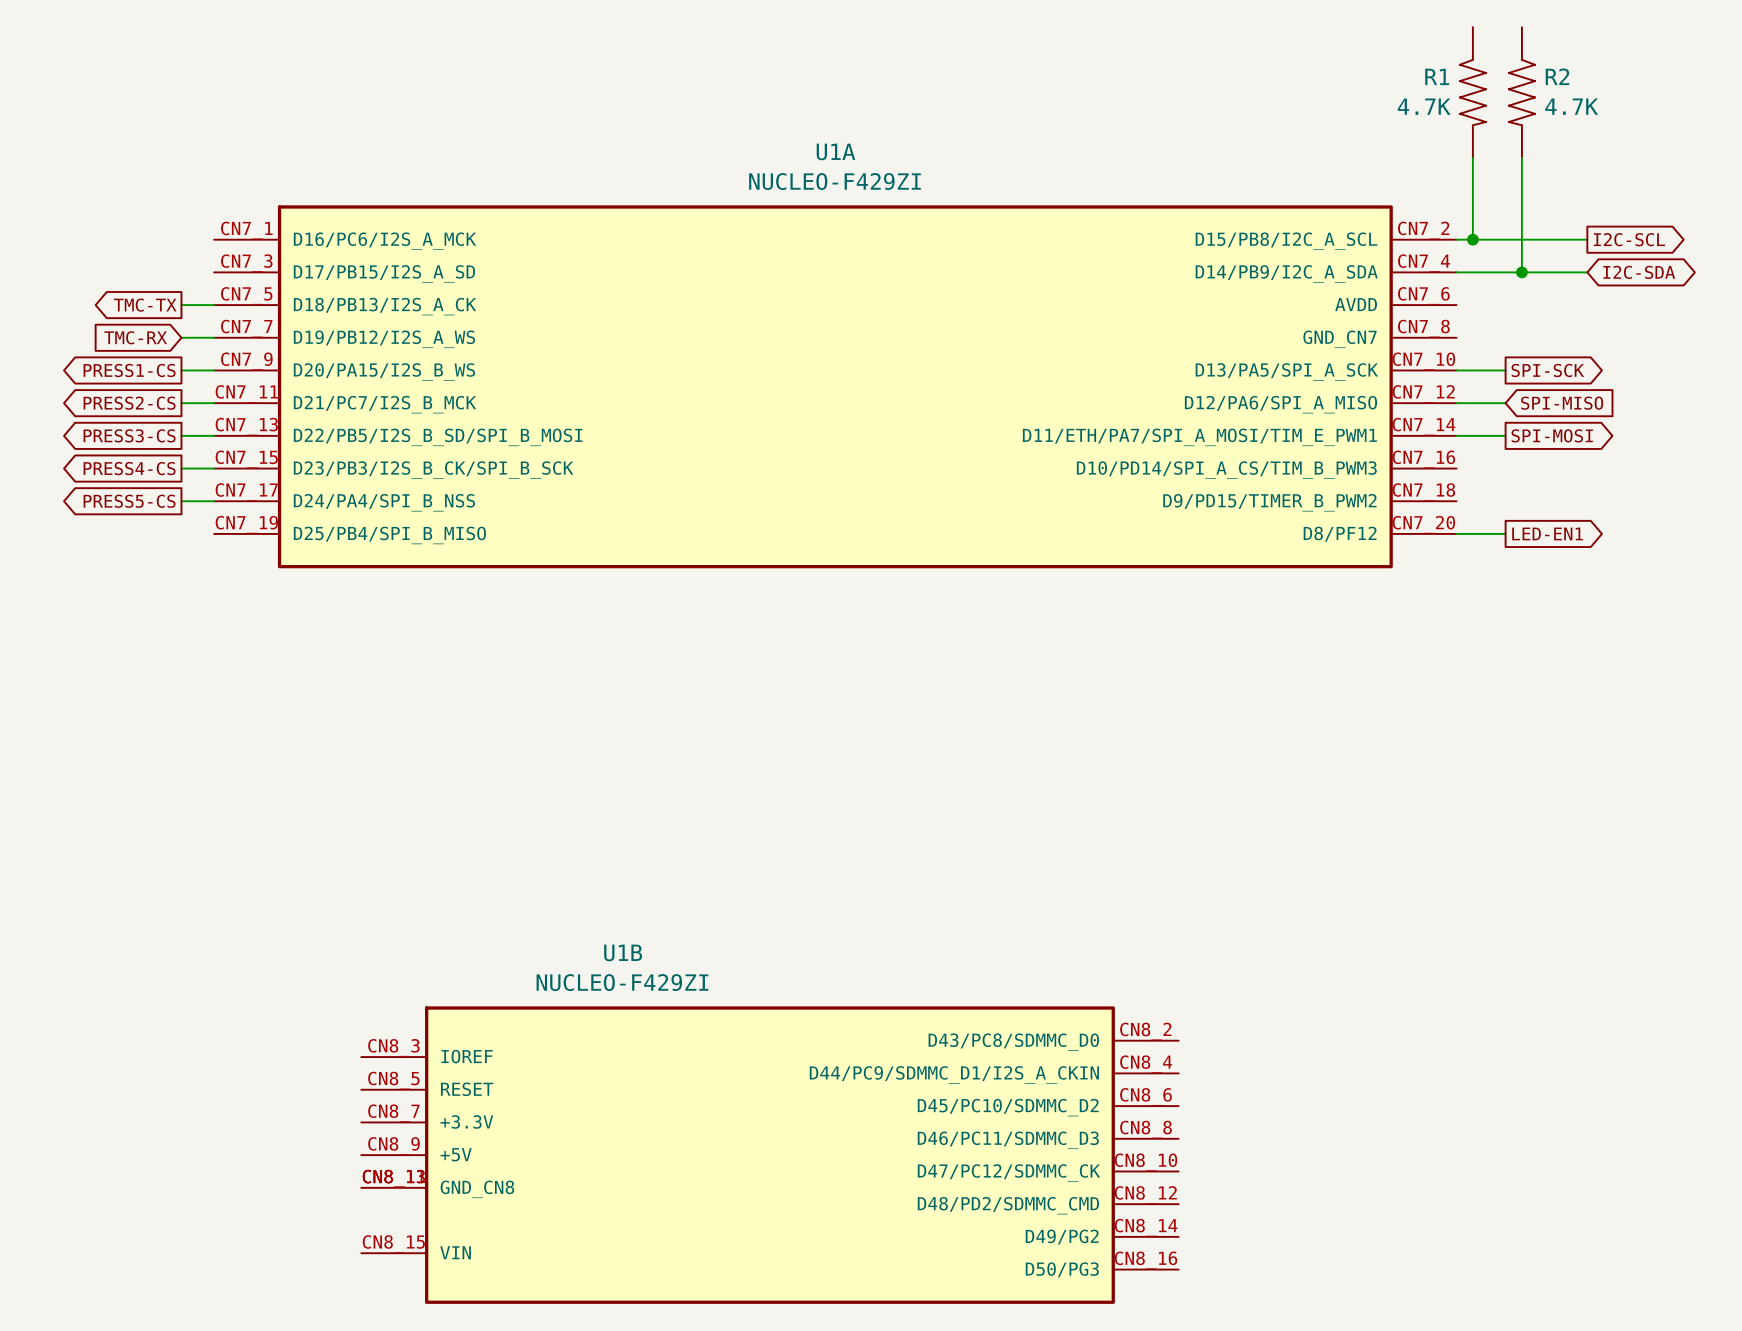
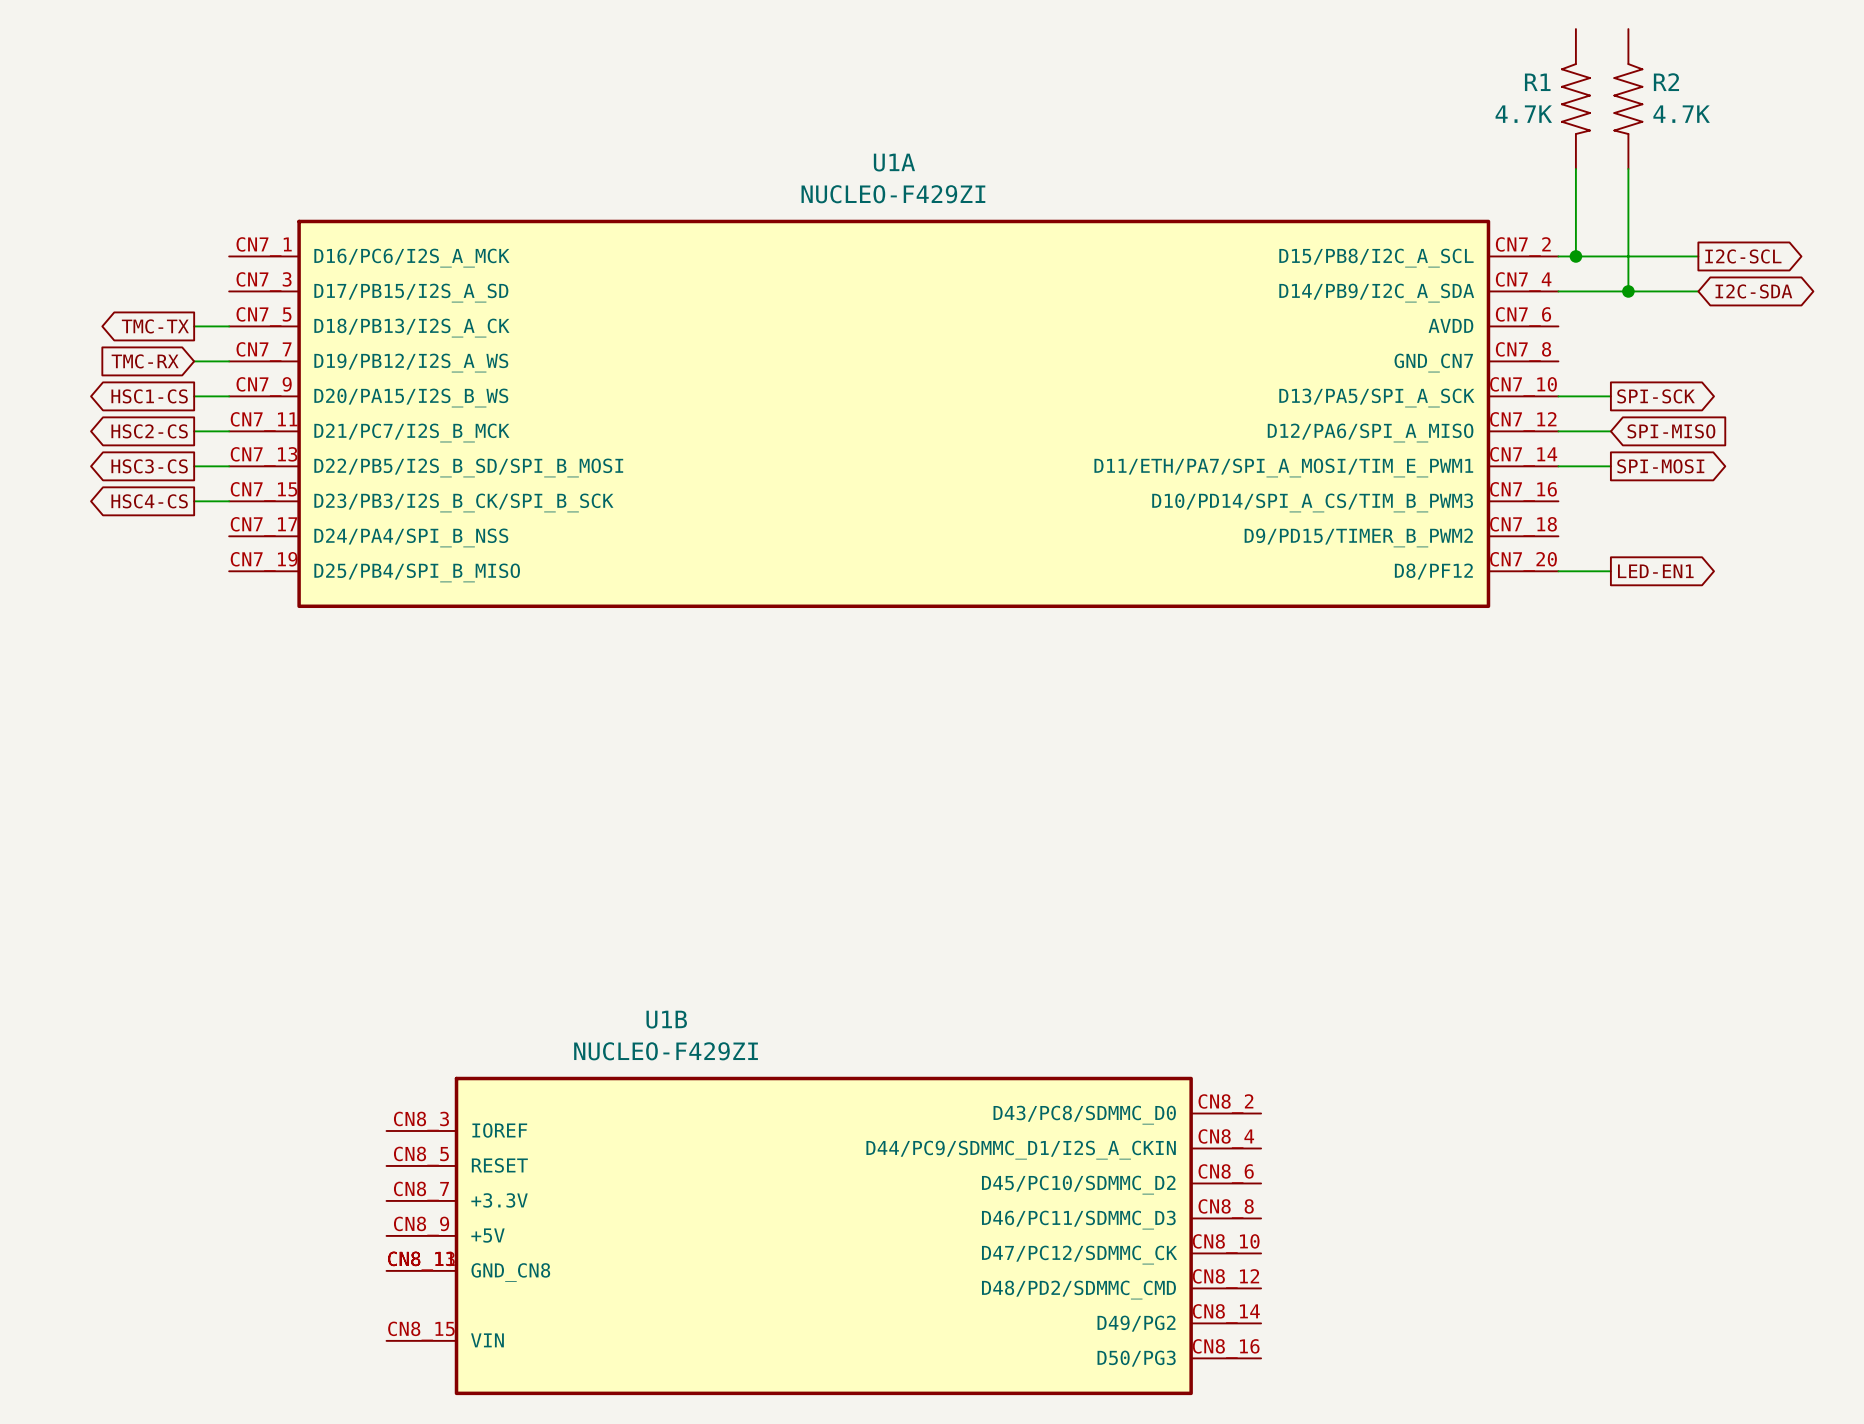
global label: PRESS1-CS (129, 370) -> HSC1-CS (149, 396)
global label: PRESS2-CS (129, 403) -> HSC2-CS (149, 431)
global label: PRESS3-CS (129, 435) -> HSC3-CS (149, 466)
global label: PRESS4-CS (129, 468) -> HSC4-CS (149, 501)
global label: PRESS5-CS (129, 501) -> none
wire: (181, 501) (214, 501) -> none

